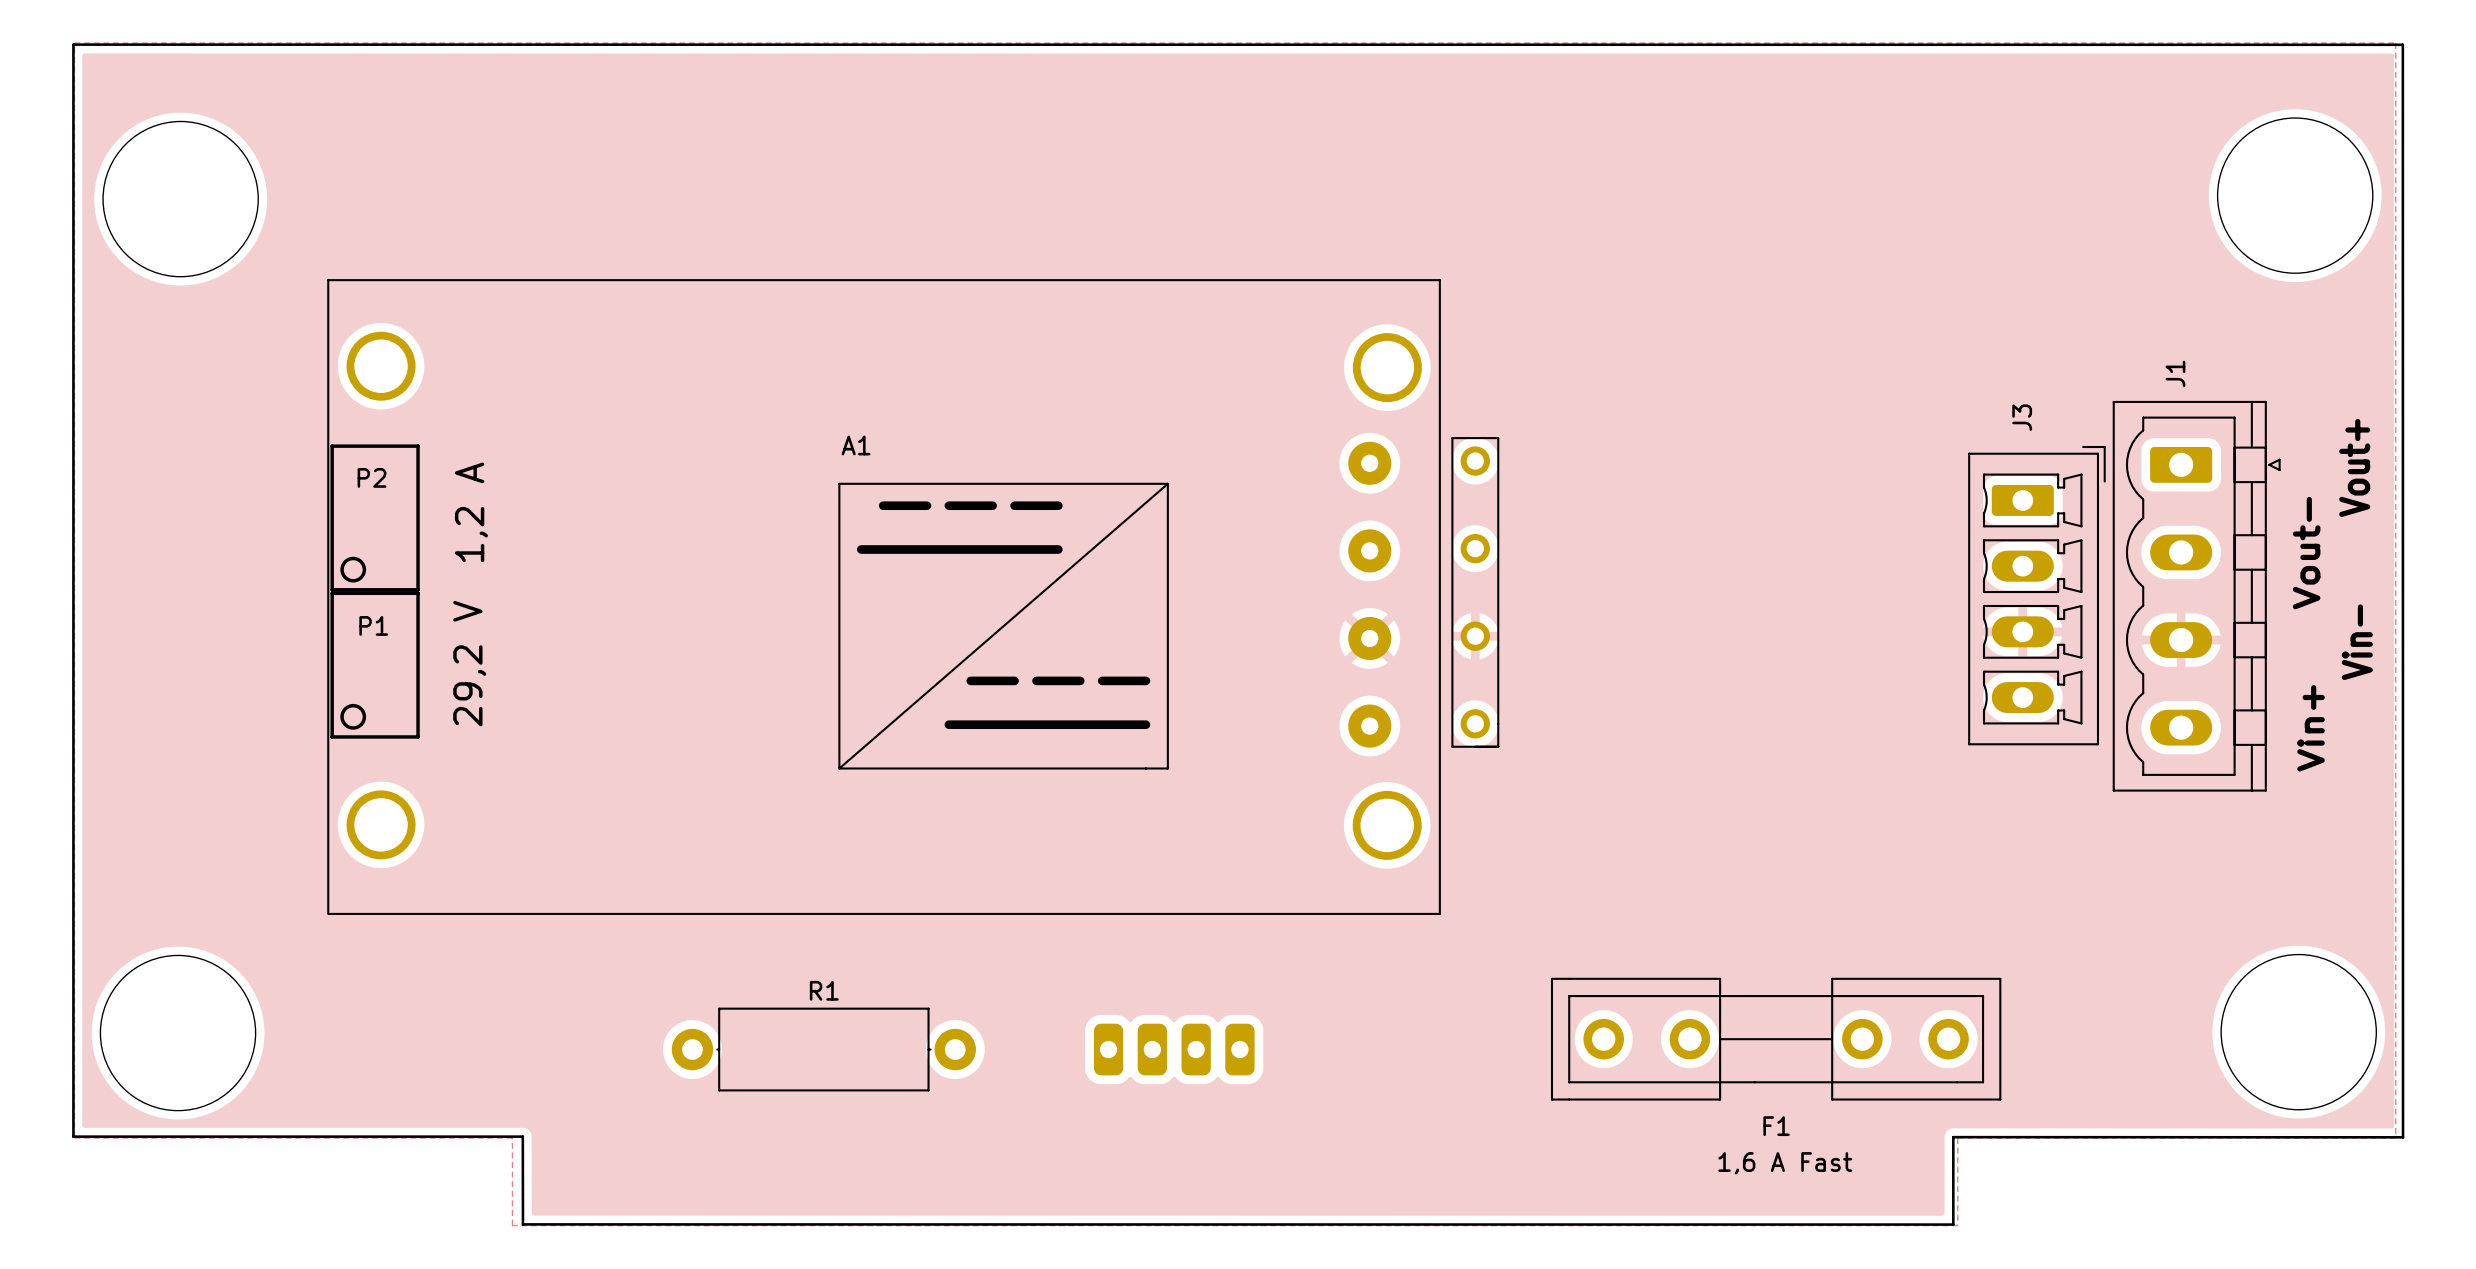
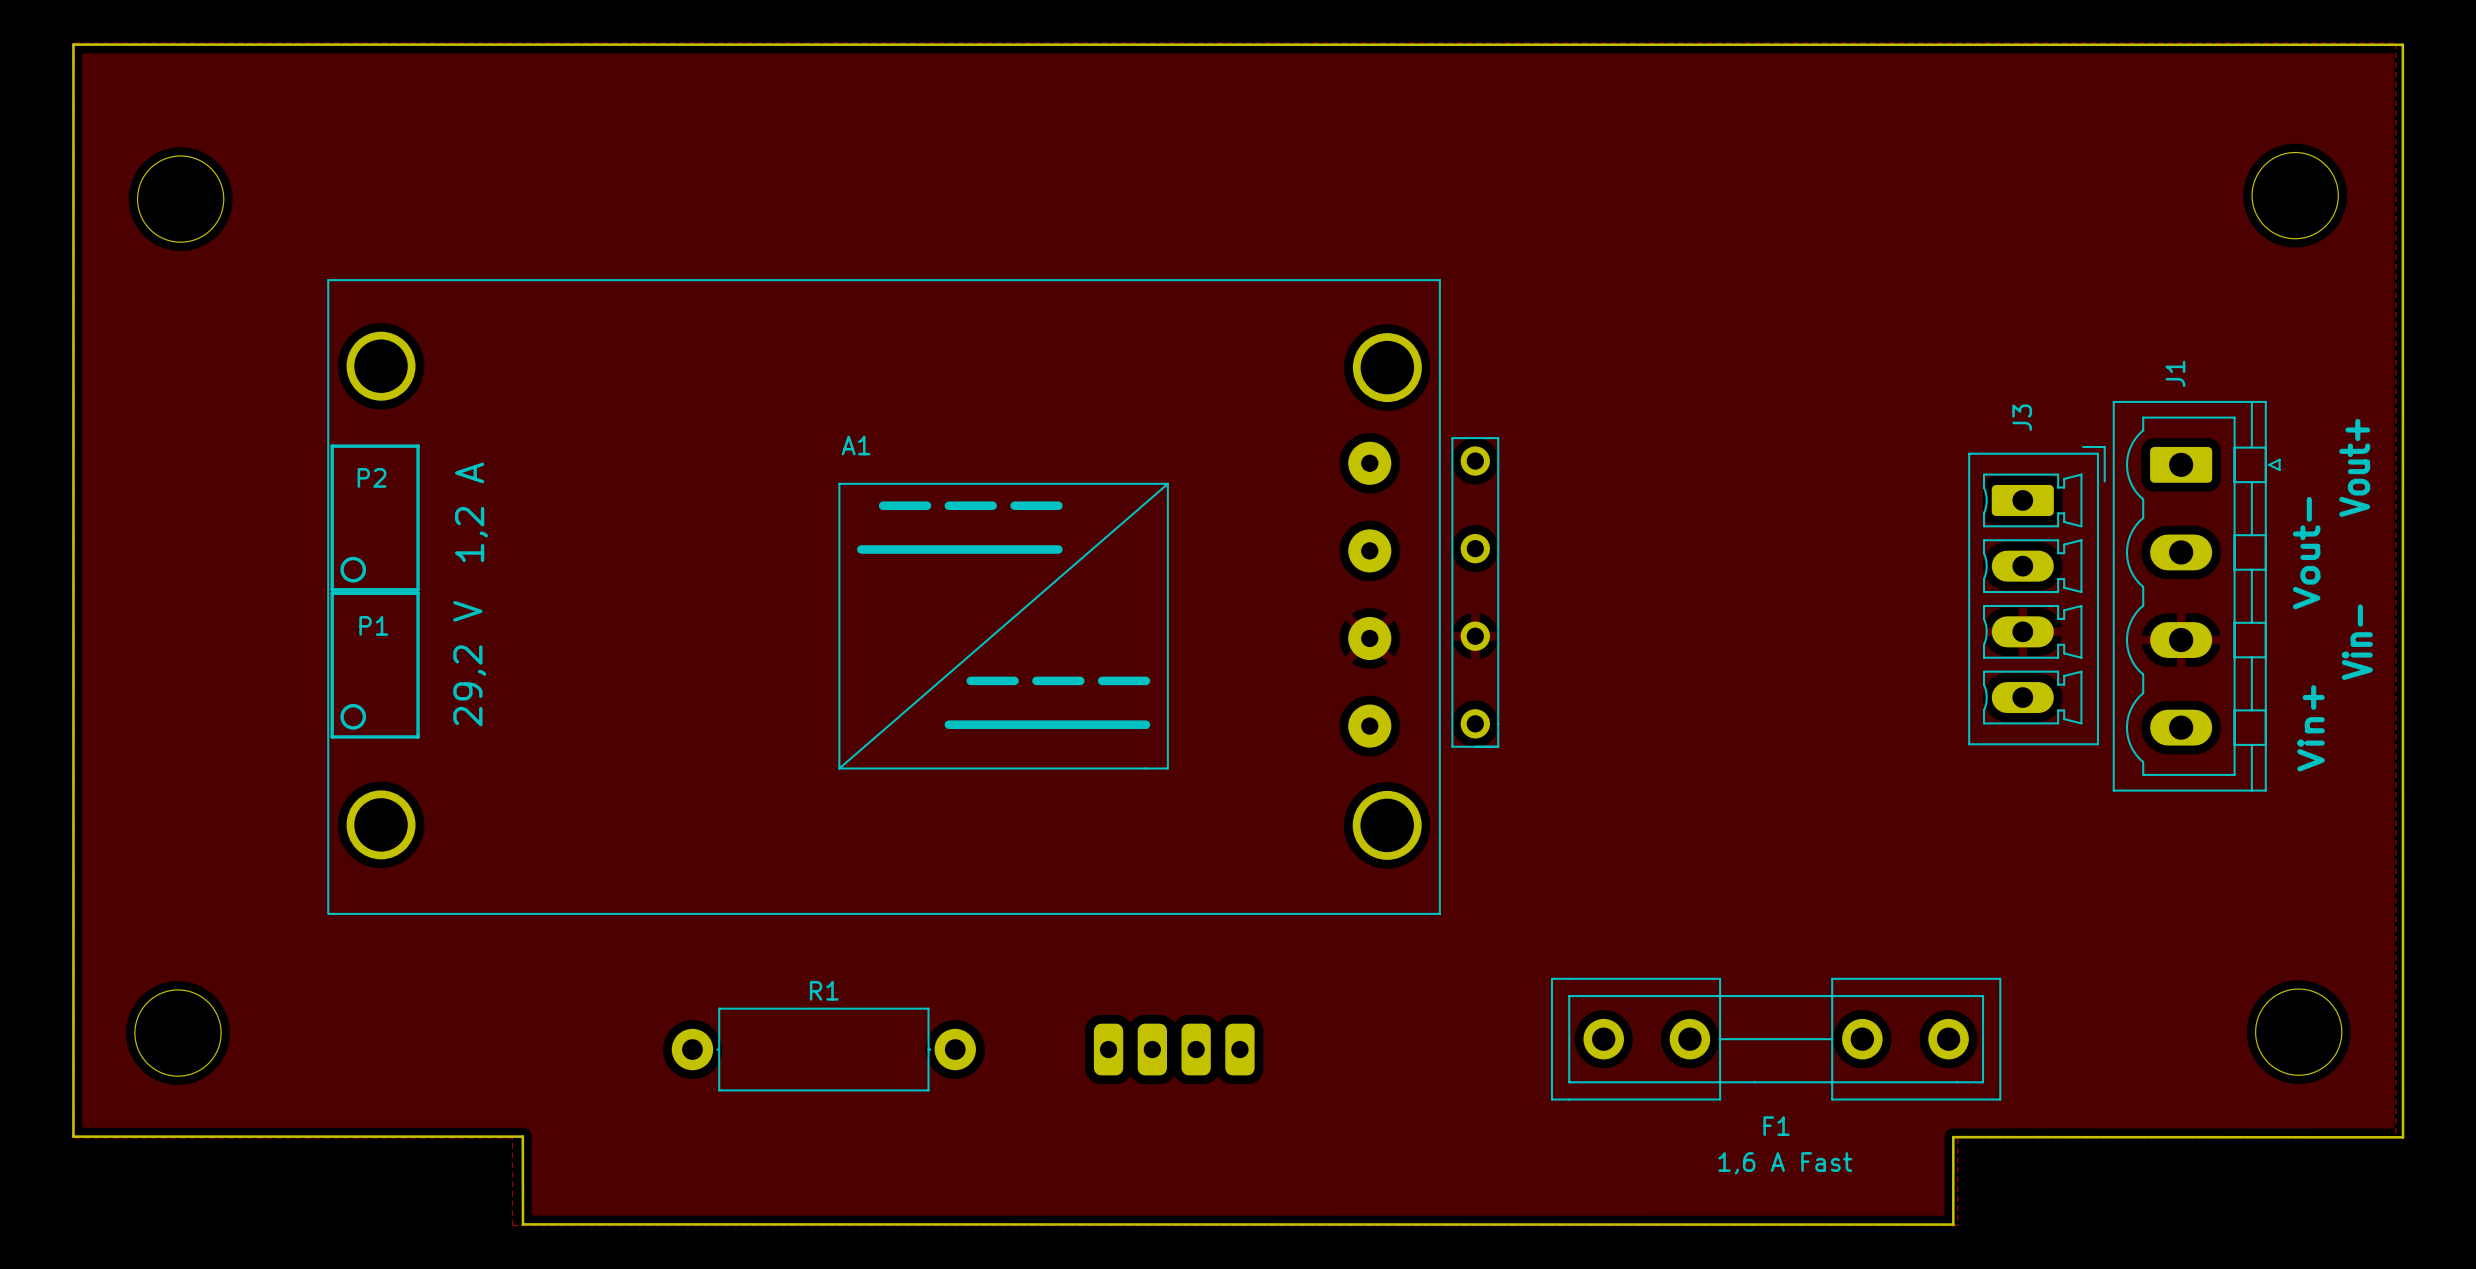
round board edge size: [2217, 117, 2374, 274] -> [2251, 152, 2339, 240]
round board edge size: [102, 121, 259, 278] -> [137, 155, 225, 243]
round board edge size: [2220, 954, 2377, 1111] -> [2255, 988, 2343, 1076]
round board edge size: [99, 955, 257, 1112] -> [134, 989, 222, 1077]

